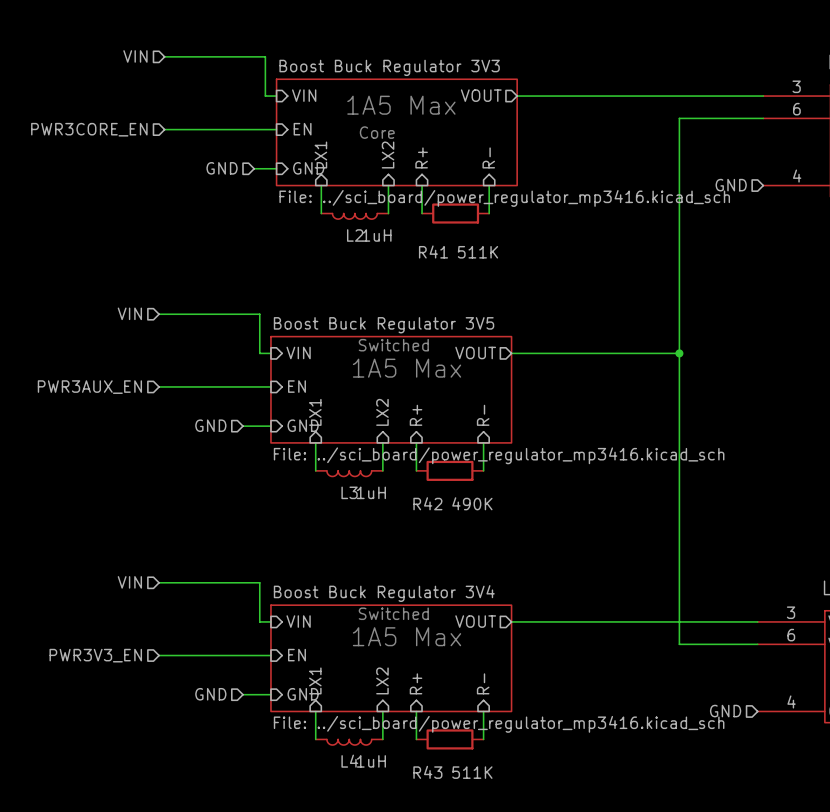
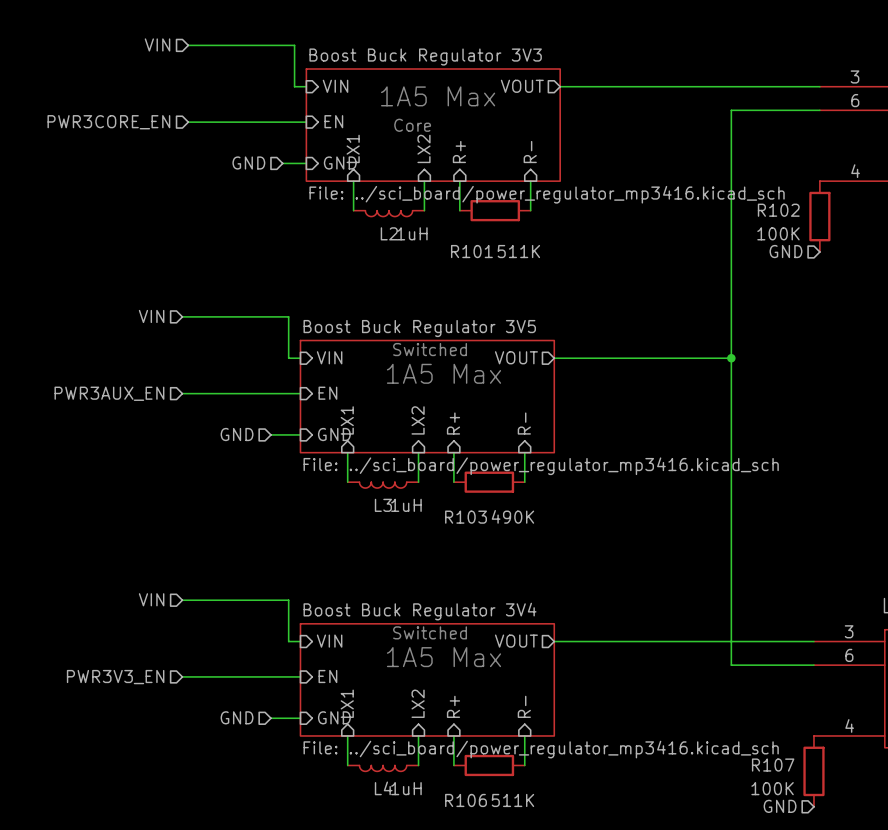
hierarchical label position: GND (731, 185) -> GND (785, 251)
R102: none -> 100K (819, 216)
R41 name: R41 (433, 252) -> R101 (471, 251)
R42 name: R42 (427, 503) -> R103 (466, 517)
hierarchical label position: GND (725, 711) -> GND (780, 806)
R107: none -> 100K (813, 771)
R43 name: R43 (427, 772) -> R106 (466, 800)

